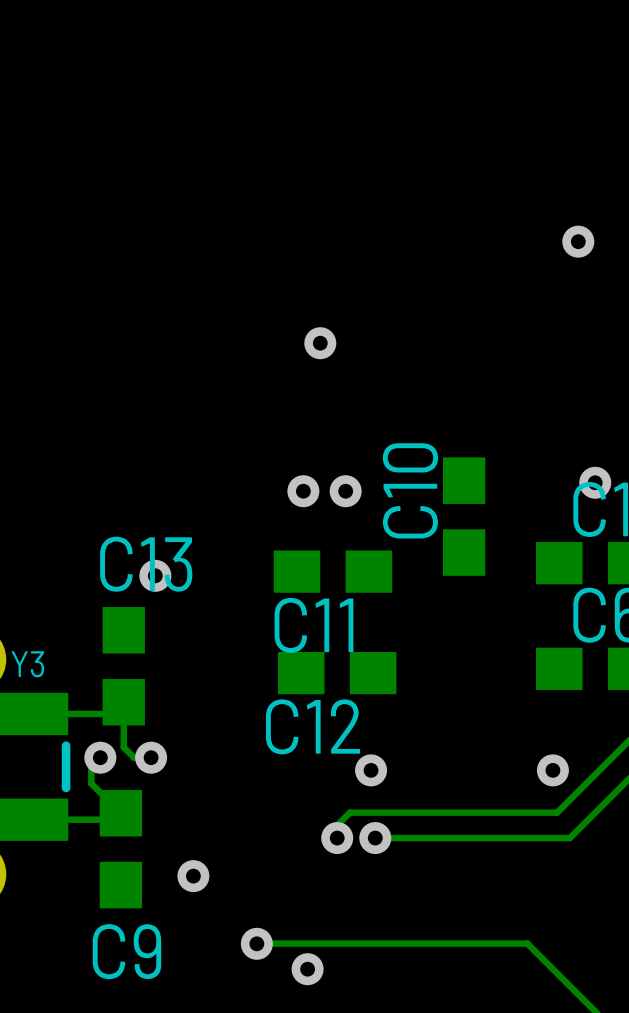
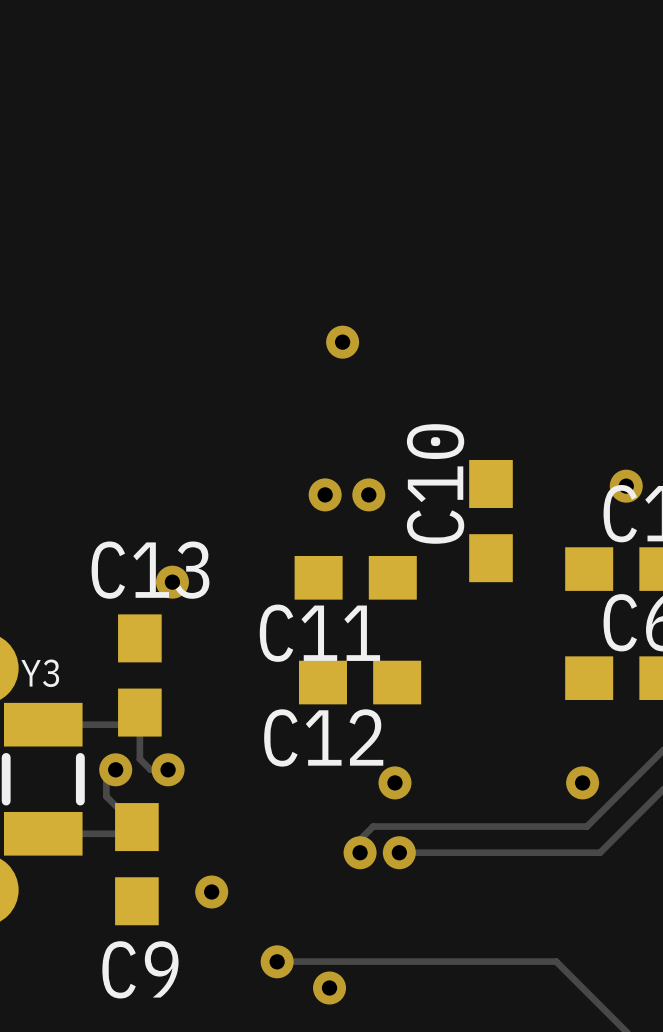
via: (578, 241) -> none

